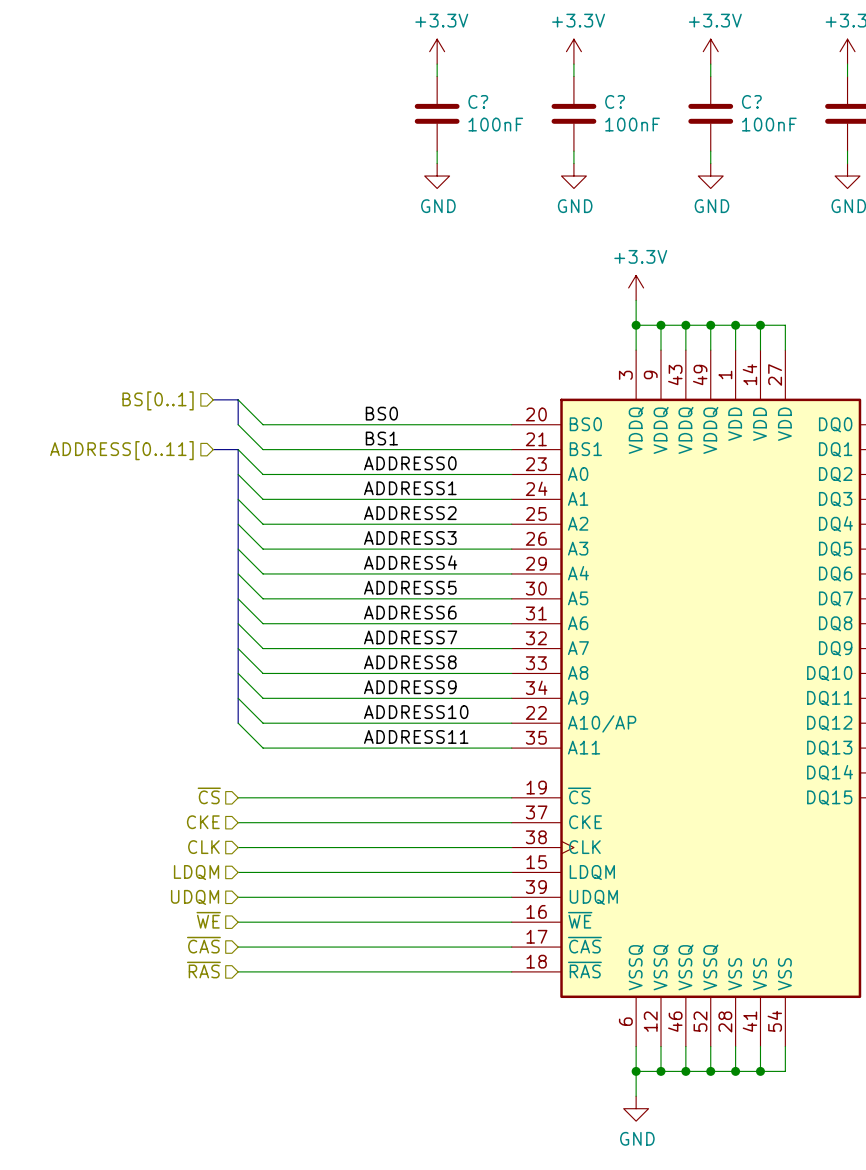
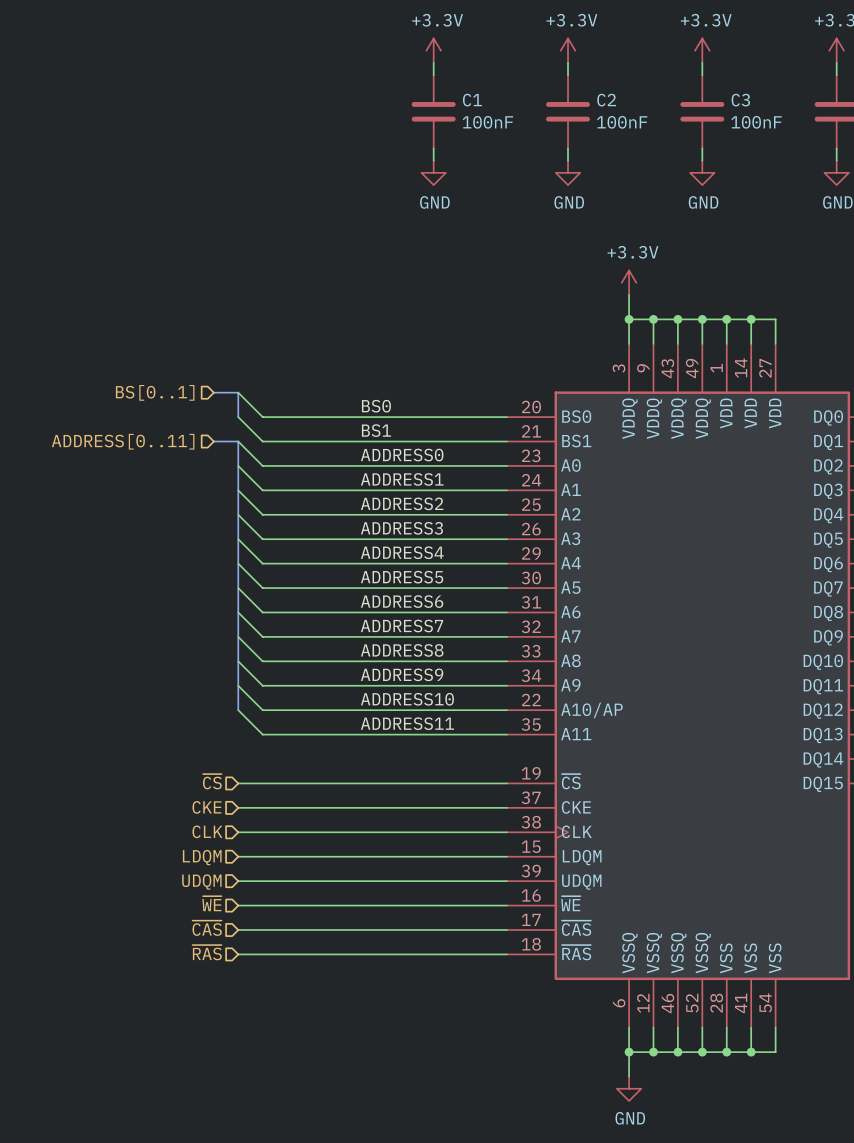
C? name: C? (478, 101) -> C1 (472, 100)
C? name: C? (615, 101) -> C2 (606, 100)
C? name: C? (751, 101) -> C3 (740, 100)

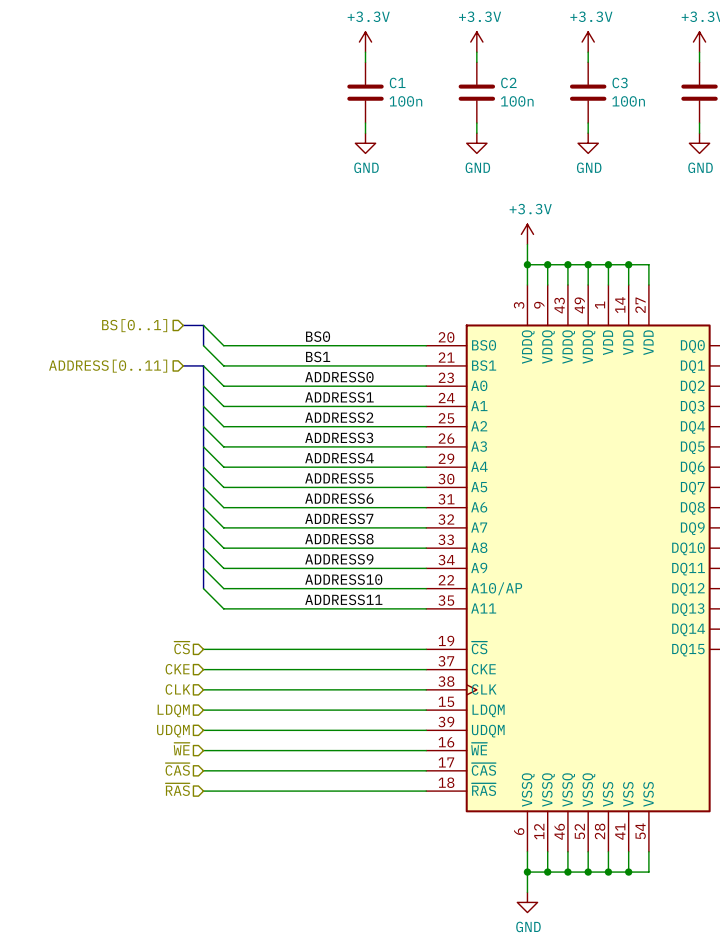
C1 value: 100nF (487, 122) -> 100n (405, 101)
C2 value: 100nF (622, 122) -> 100n (517, 101)
C3 value: 100nF (756, 122) -> 100n (628, 101)

